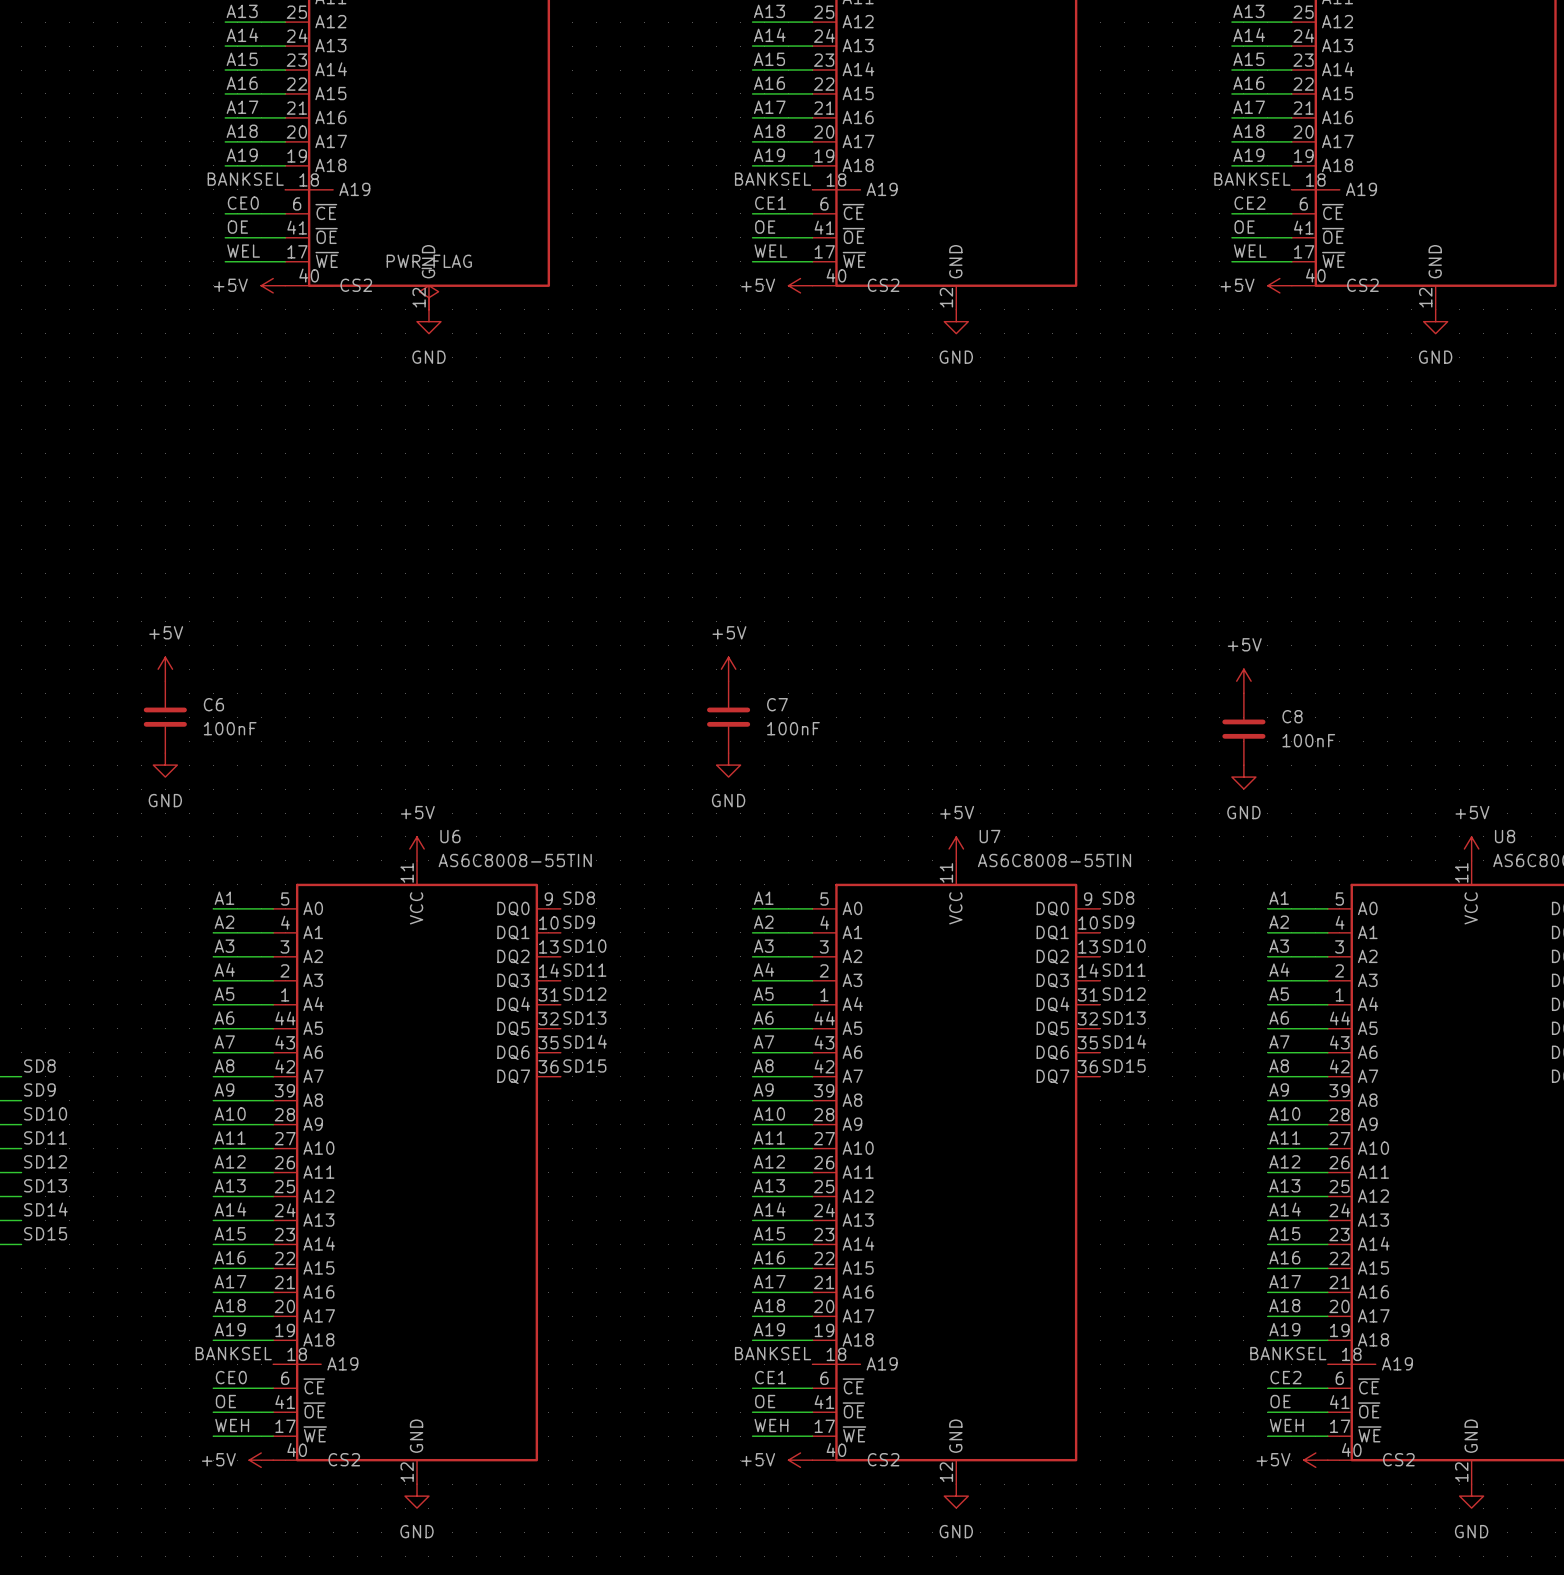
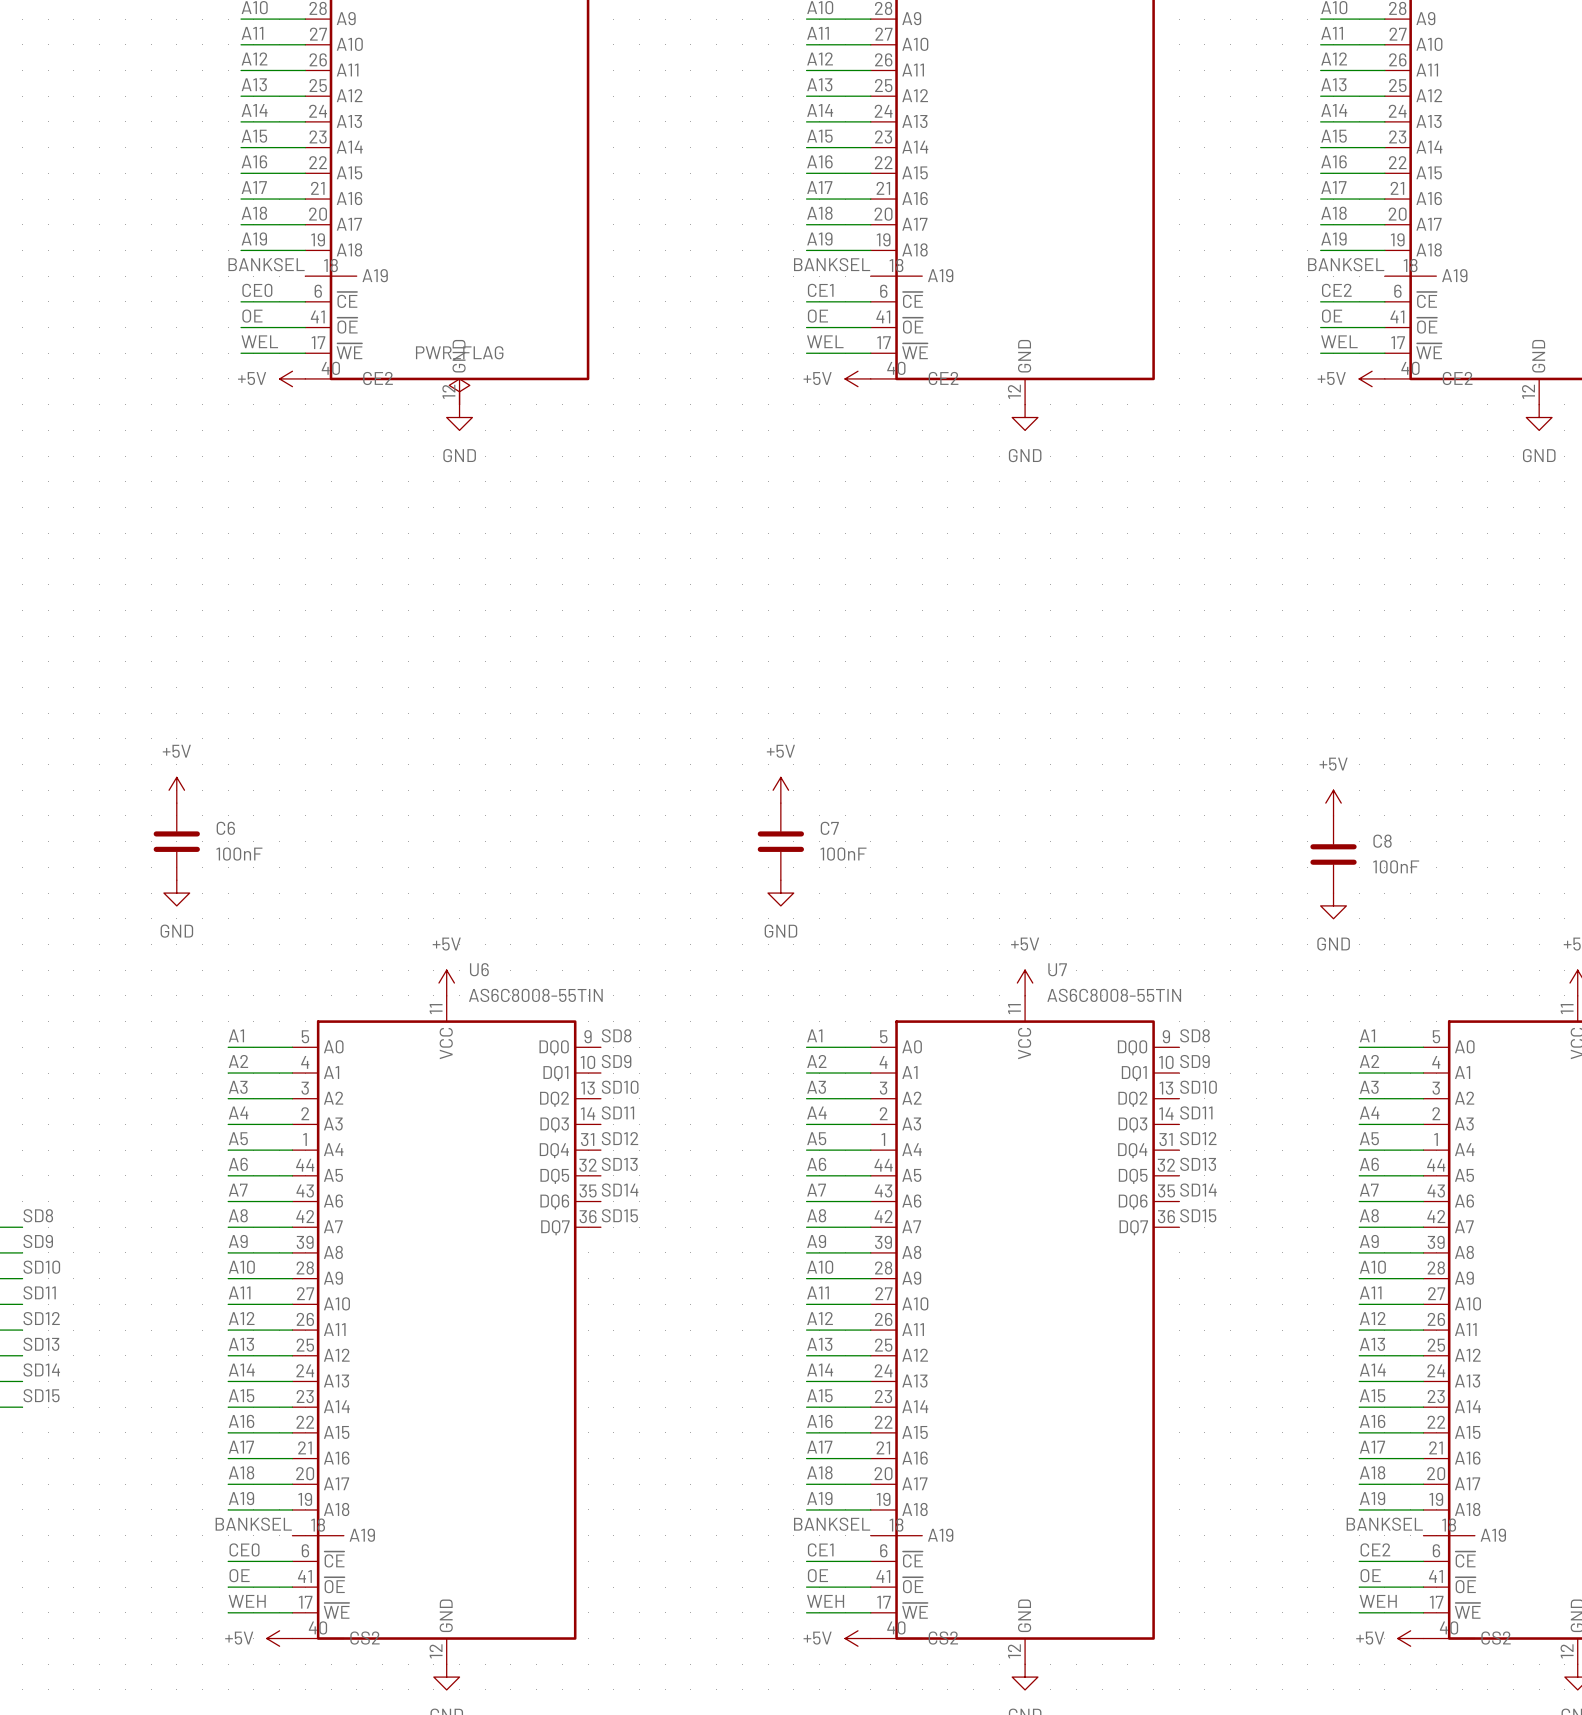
part pin name: CS2 (356, 285) -> CE2 (378, 378)
part pin name: CS2 (883, 285) -> CE2 (943, 378)
part pin name: CS2 (1362, 285) -> CE2 (1457, 378)

